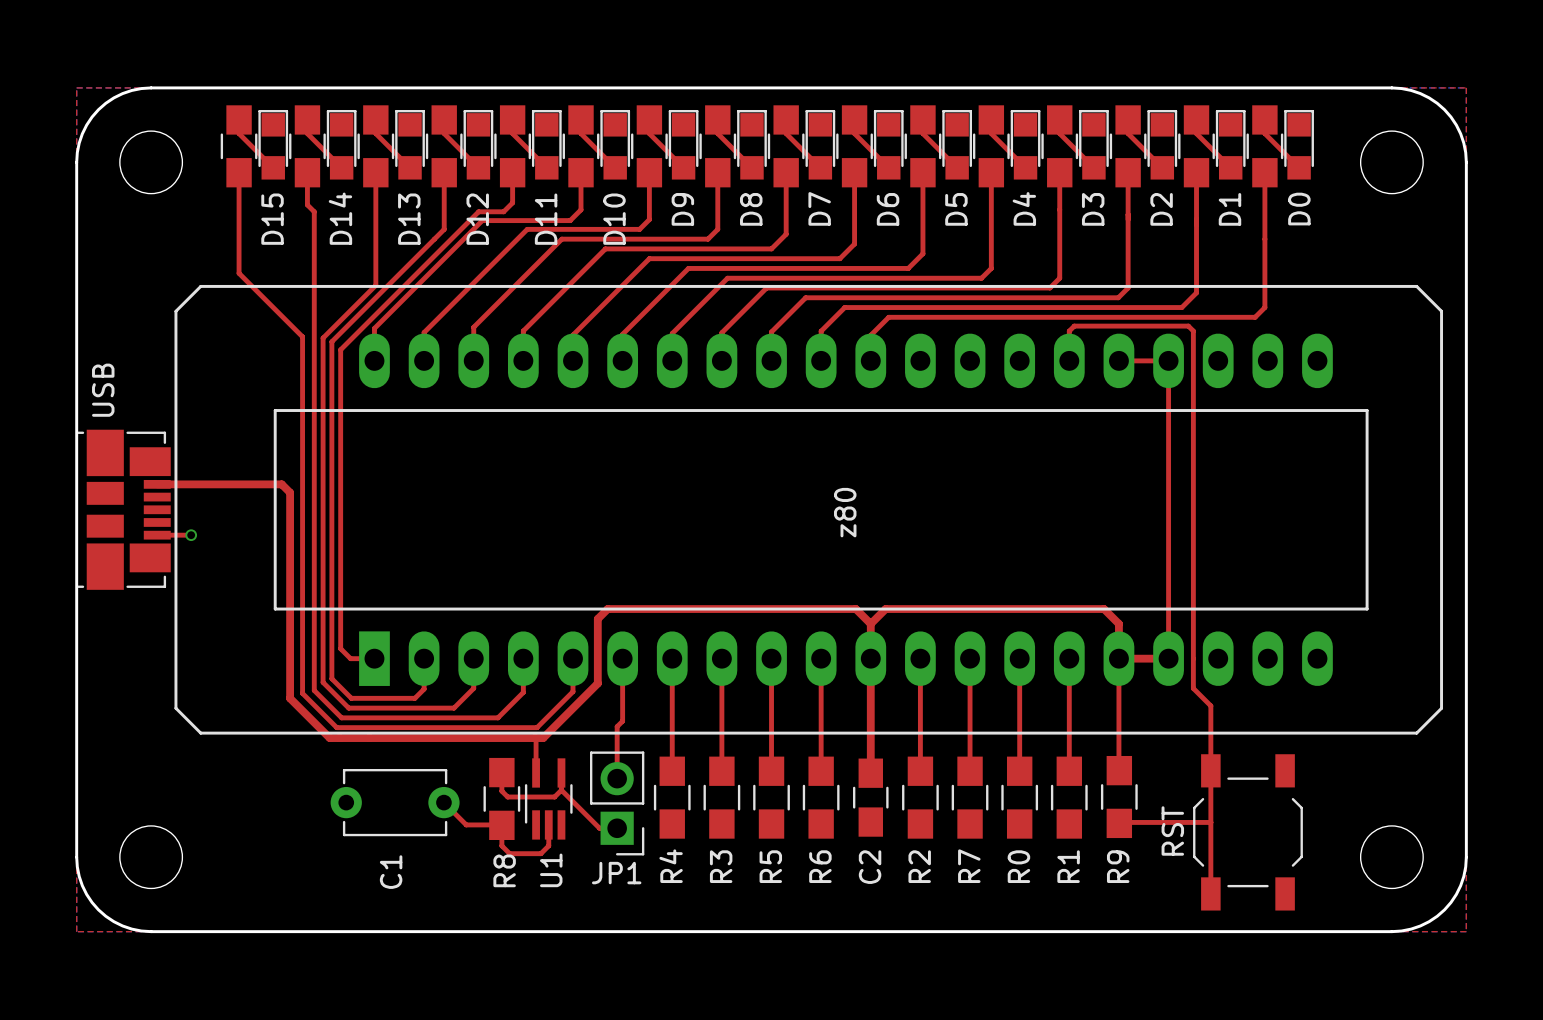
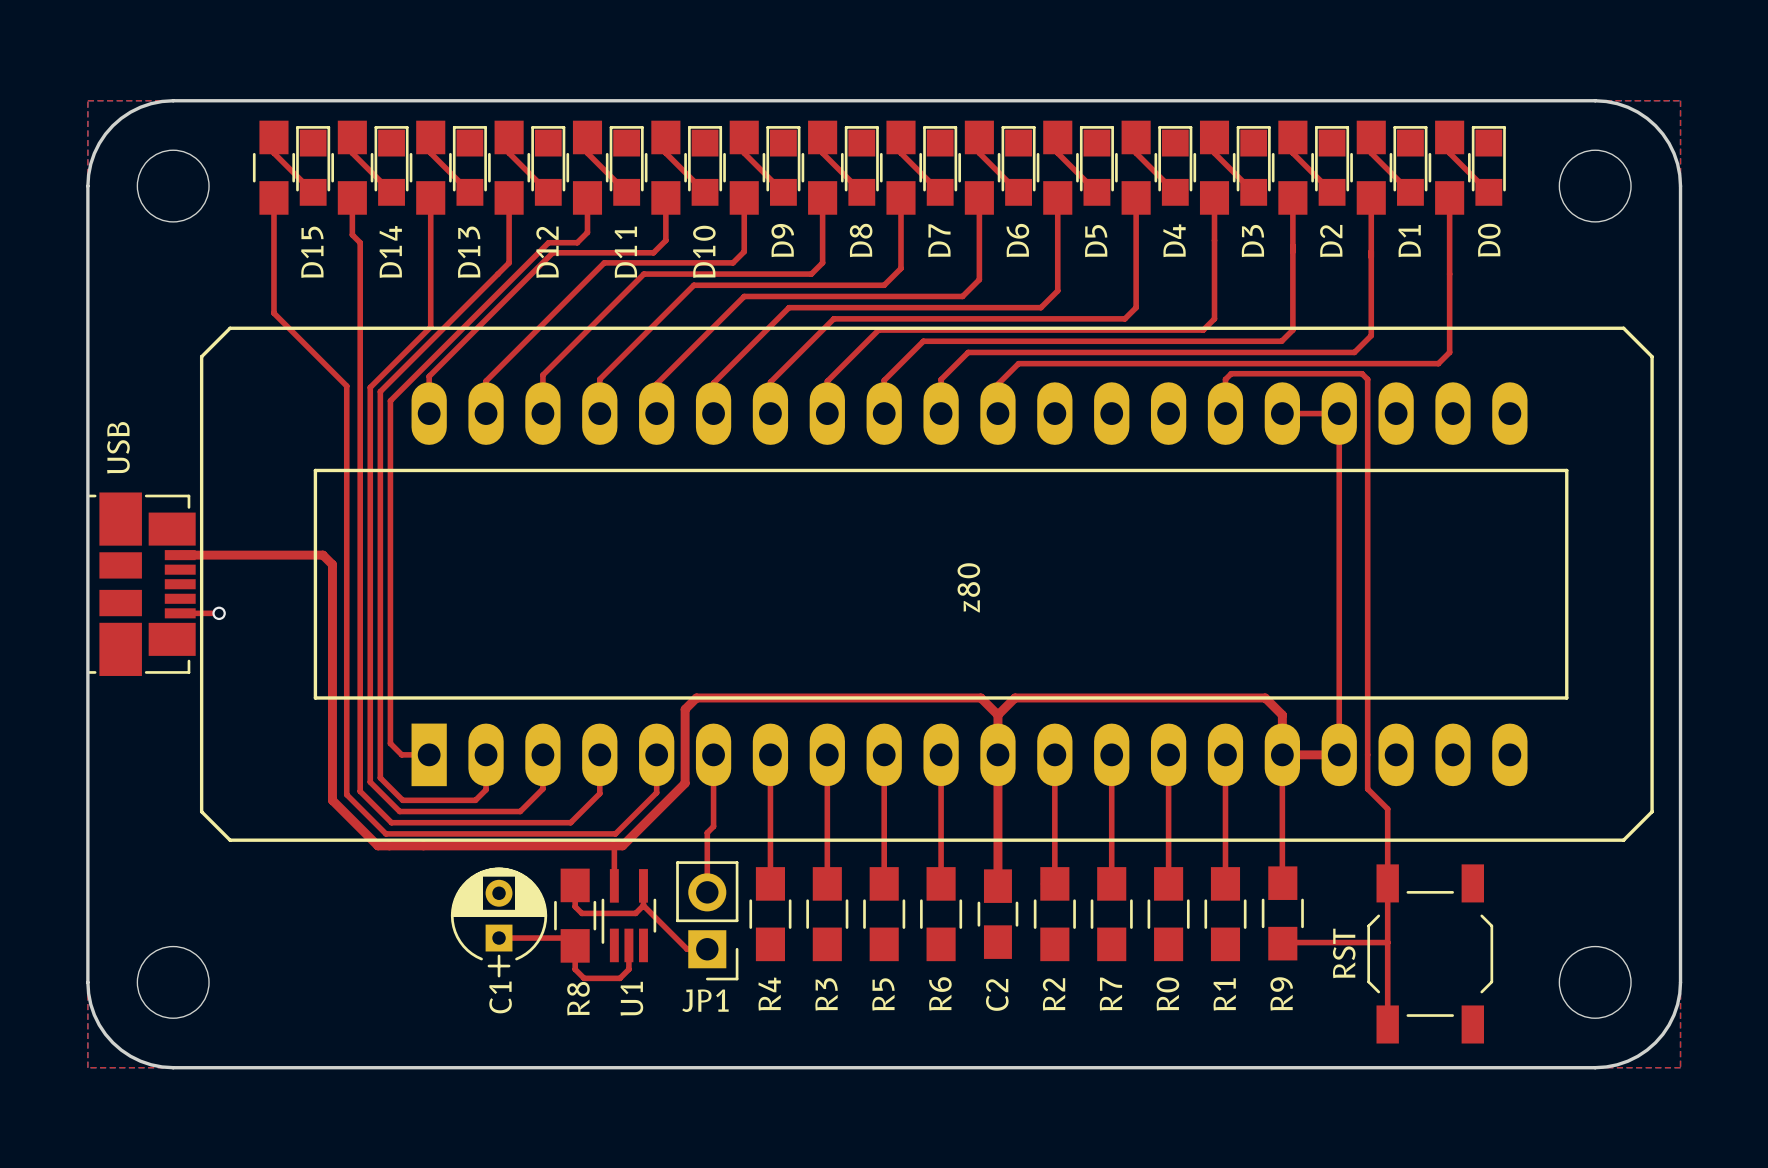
C1 footprint: [330, 768, 460, 837] -> [450, 867, 548, 978]
top track: (443, 802) (466, 824) (501, 824) -> none
top track: none -> (499, 938) (567, 938)

